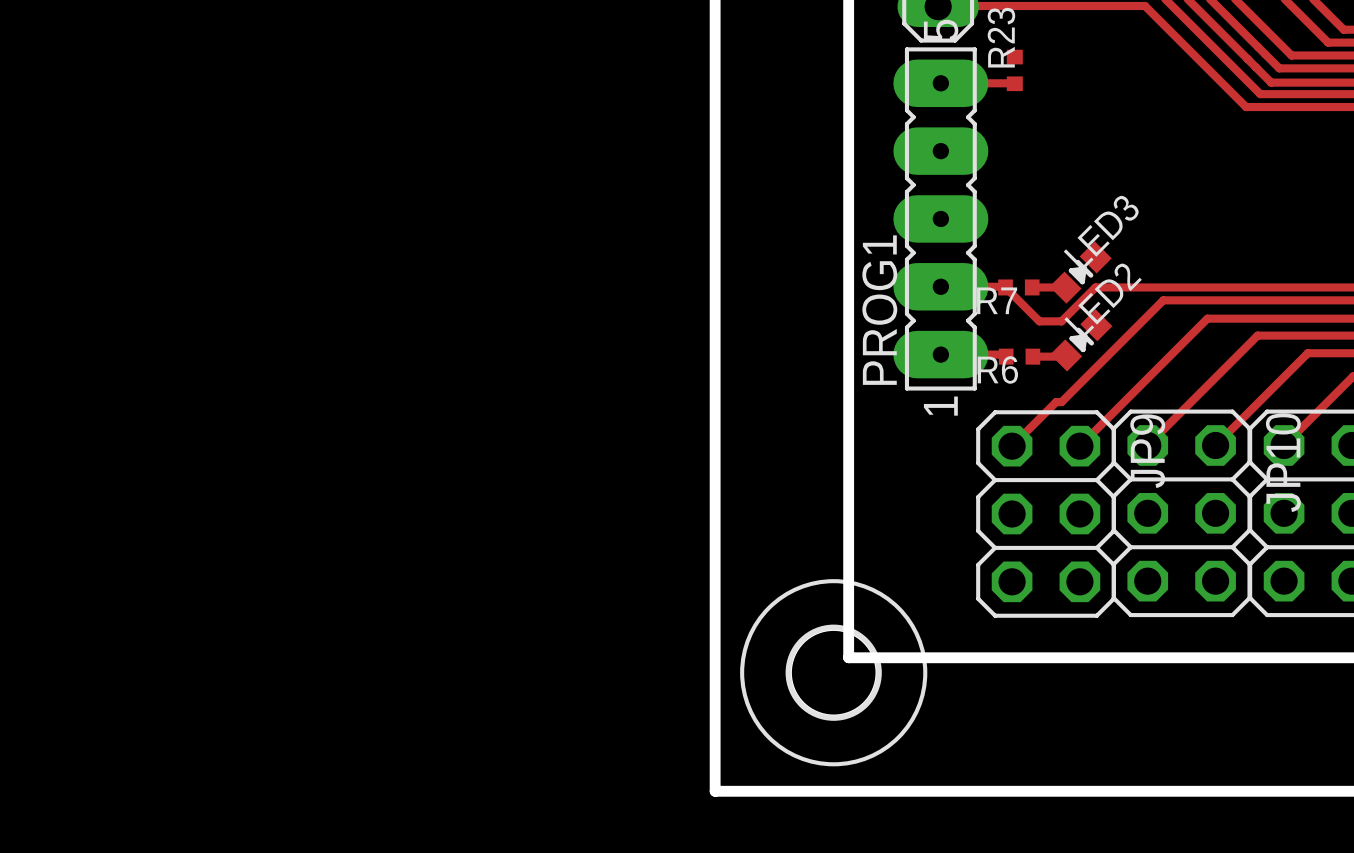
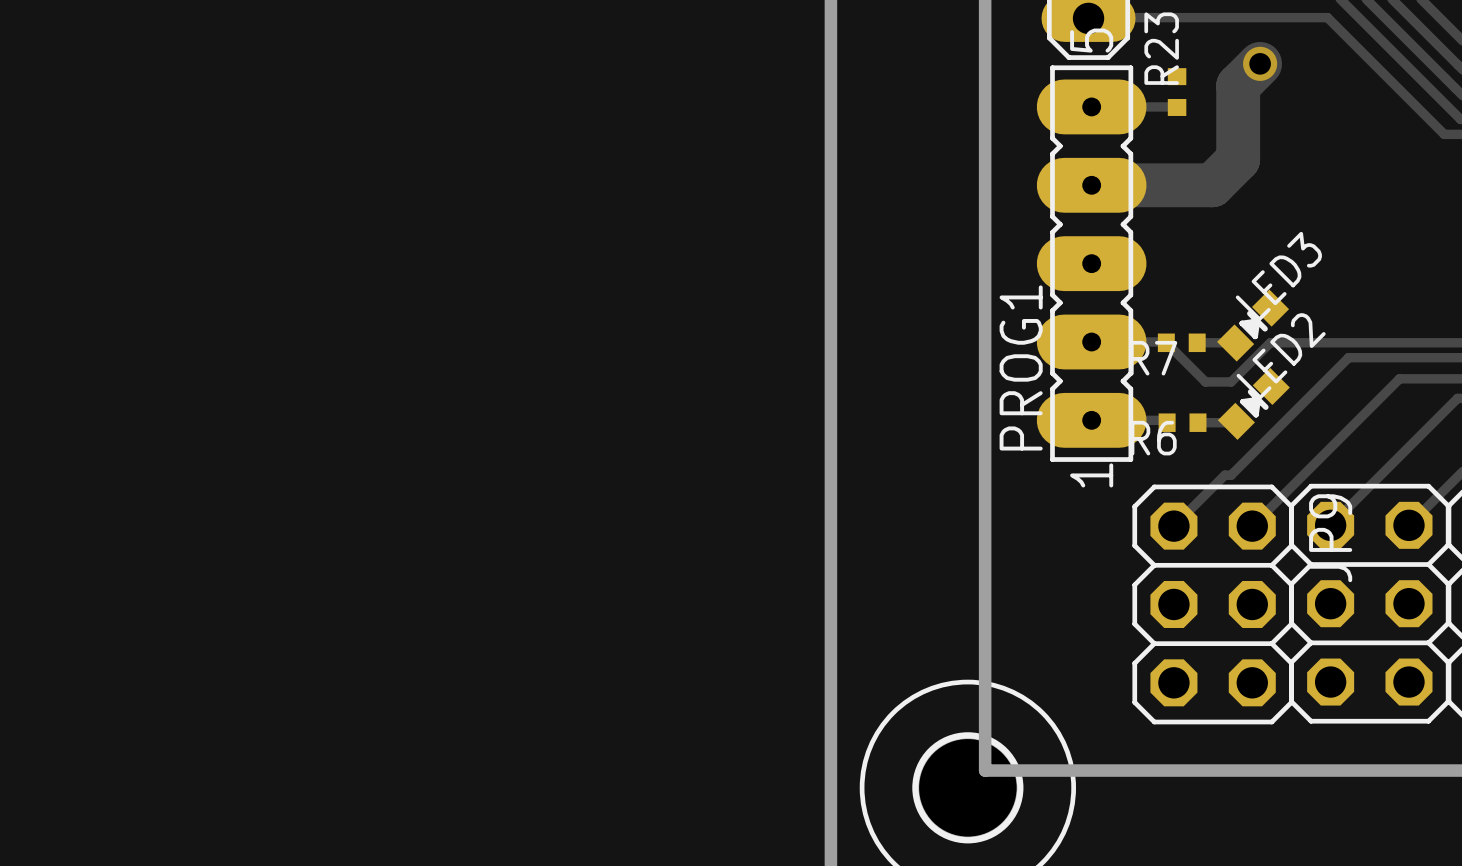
track: none -> (1260, 63) (1238, 85) (1238, 159) (1212, 185) (1091, 185)
via: none -> (1260, 63)

